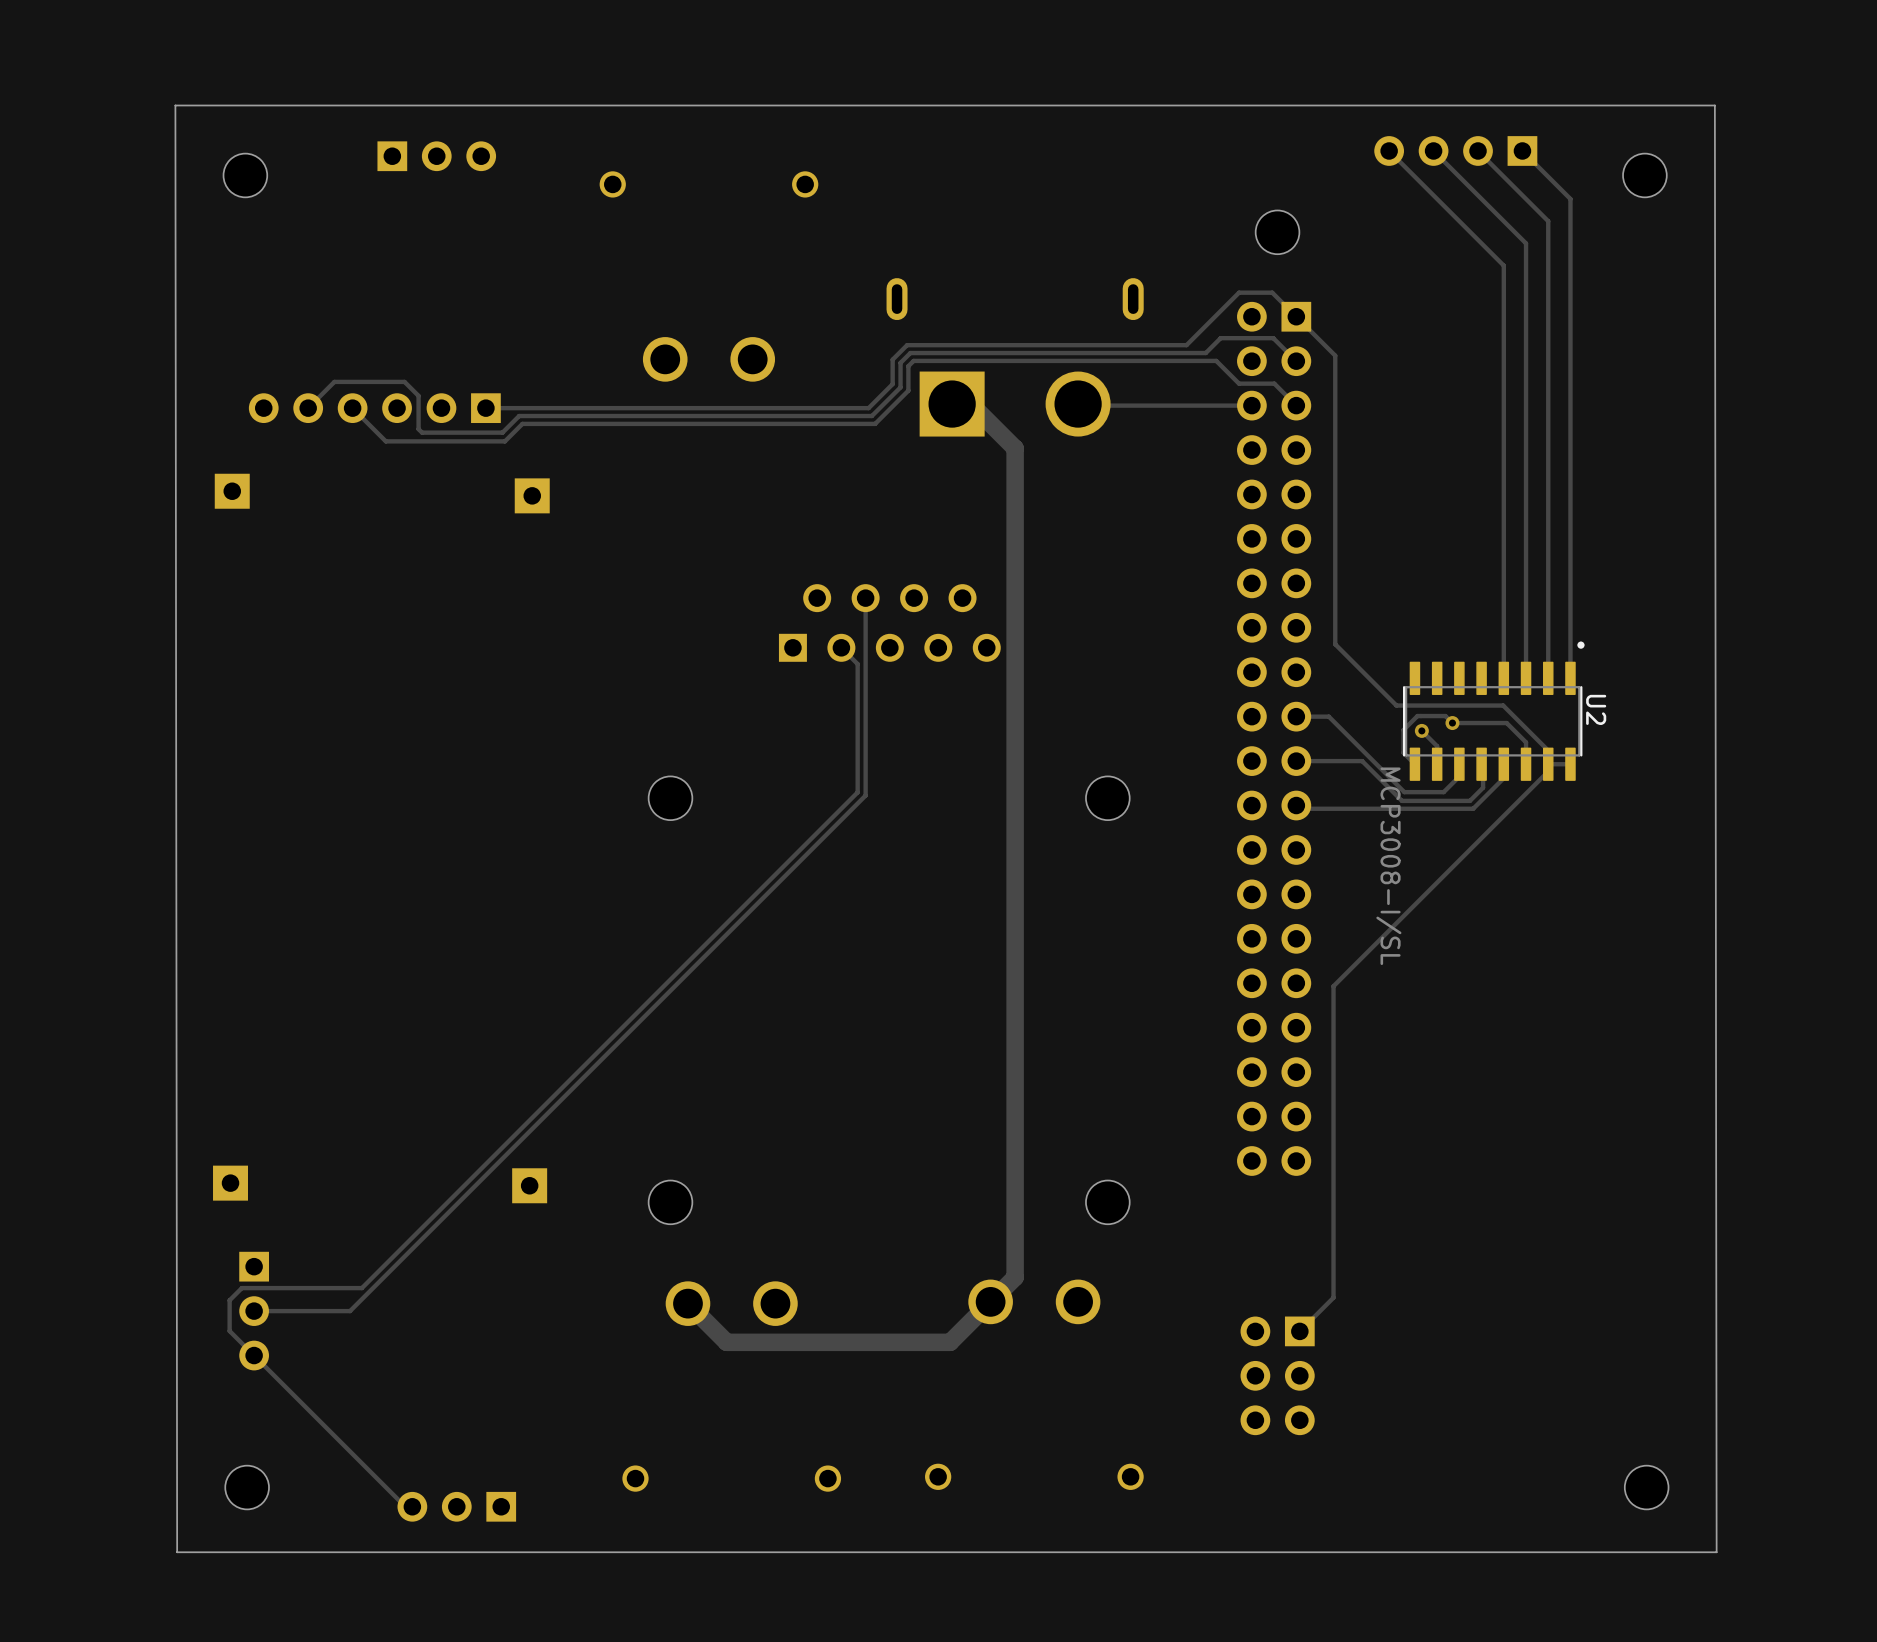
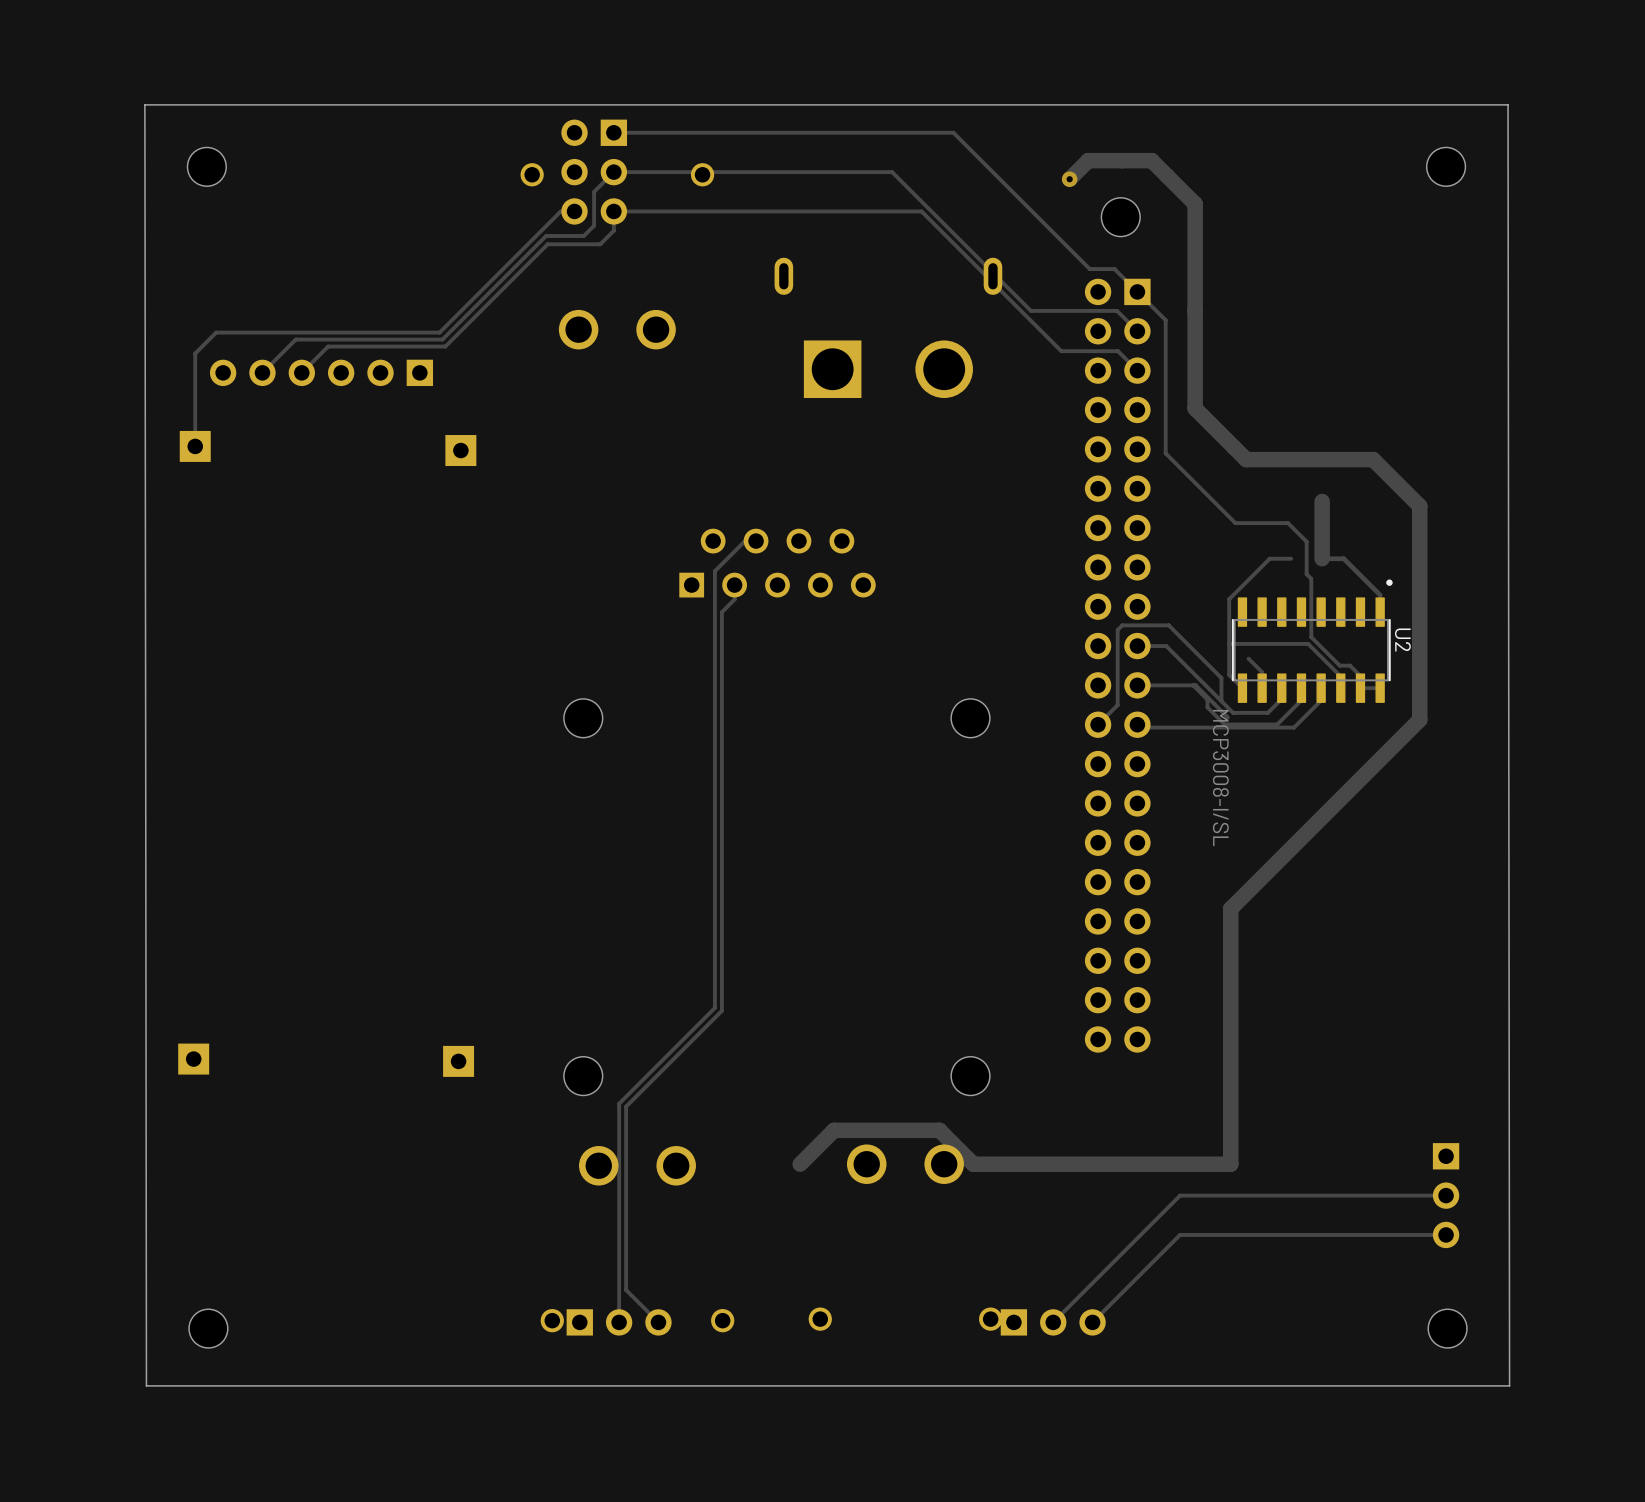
track: (1389, 150) (1503, 265) (1503, 678) -> none
track: (1433, 150) (1526, 243) (1526, 678) -> none
part: (1455, 150) -> none
track: (1478, 150) (1548, 221) (1548, 678) -> none
track: (1522, 150) (1570, 199) (1570, 659) -> (1322, 501) (1322, 558) (1343, 558) (1380, 595)
part: (436, 156) -> none
part: none -> (594, 172)
track: none -> (1069, 179) (1088, 160) (1151, 160) (1195, 204) (1195, 408) (1246, 459) (1373, 459) (1419, 506) (1419, 719) (1230, 908) (1230, 1164) (973, 1164) (939, 1130) (834, 1130) (800, 1164)
via: none -> (1069, 179)
track: none -> (574, 211) (560, 211) (439, 332) (216, 332) (195, 353) (195, 446)
track: (1272, 292) (1239, 292) (1186, 345) (907, 345) (892, 359) (892, 384) (868, 408) (485, 408) -> (1116, 270) (1089, 269) (953, 132) (613, 132)
track: (1220, 338) (1205, 353) (910, 353) (900, 362) (900, 387) (871, 416) (519, 416) (502, 432) (422, 432) (418, 429) (418, 395) (404, 381) (334, 381) -> (1070, 310) (1030, 310) (892, 172) (613, 172) (594, 191) (594, 225) (583, 235) (546, 235) (442, 339) (295, 339) (285, 349)
track: (1328, 348) (1335, 355) (1335, 644) (1396, 705) (1503, 705) (1536, 738) -> (1165, 320) (1165, 453) (1235, 523) (1288, 523) (1306, 541) (1306, 574) (1311, 578) (1311, 637) (1339, 665) (1350, 665)
track: (1239, 383) (1216, 360) (913, 360) (908, 366) (908, 390) (875, 423) (522, 423) (504, 441) (385, 441) (352, 408) -> (1086, 351) (1061, 351) (921, 211) (613, 211) (613, 230) (600, 244) (547, 244) (445, 346) (328, 346) (301, 372)
track: (952, 404) (970, 404) (1015, 448) (1015, 1277) (950, 1342) (726, 1342) (687, 1303) -> none
track: (1078, 404) (1079, 405) (1251, 405) -> none
track: (865, 598) (865, 795) (350, 1311) (254, 1311) -> (756, 541) (744, 541) (714, 571) (714, 1007) (619, 1103) (619, 1322)
track: none -> (1291, 558) (1269, 558) (1229, 599) (1229, 674) (1232, 678)
track: (841, 647) (857, 664) (857, 792) (361, 1288) (241, 1288) (229, 1300) (229, 1331) (405, 1506) (412, 1506) -> (734, 585) (734, 599) (721, 612) (721, 1010) (626, 1106) (626, 1290) (658, 1322)
via: (1452, 723) -> none
via: (1421, 730) -> none
track: (1526, 751) (1526, 742) (1506, 723) (1452, 723) (1445, 716) (1417, 716) (1403, 730) (1403, 752) -> (1340, 676) (1308, 643) (1229, 643)
track: (1481, 764) (1483, 787) (1469, 800) (1401, 800) (1398, 797) -> (1301, 688) (1301, 700) (1277, 724) (1224, 724) (1207, 707) (1207, 699) (1193, 685)
track: (1548, 764) (1548, 771) (1333, 986) (1333, 1297) (1299, 1331) -> none
track: none -> (1221, 701) (1221, 678) (1168, 625) (1122, 625) (1117, 630) (1117, 705) (1098, 724)
part: (254, 1311) -> none
track: none -> (1446, 1195) (1180, 1195) (1053, 1322)
part: none -> (1446, 1195)
part: (1277, 1375) -> none
track: none -> (1446, 1234) (1180, 1234) (1092, 1322)
part: none -> (619, 1322)
part: none -> (1053, 1322)
part: (456, 1506) -> none

